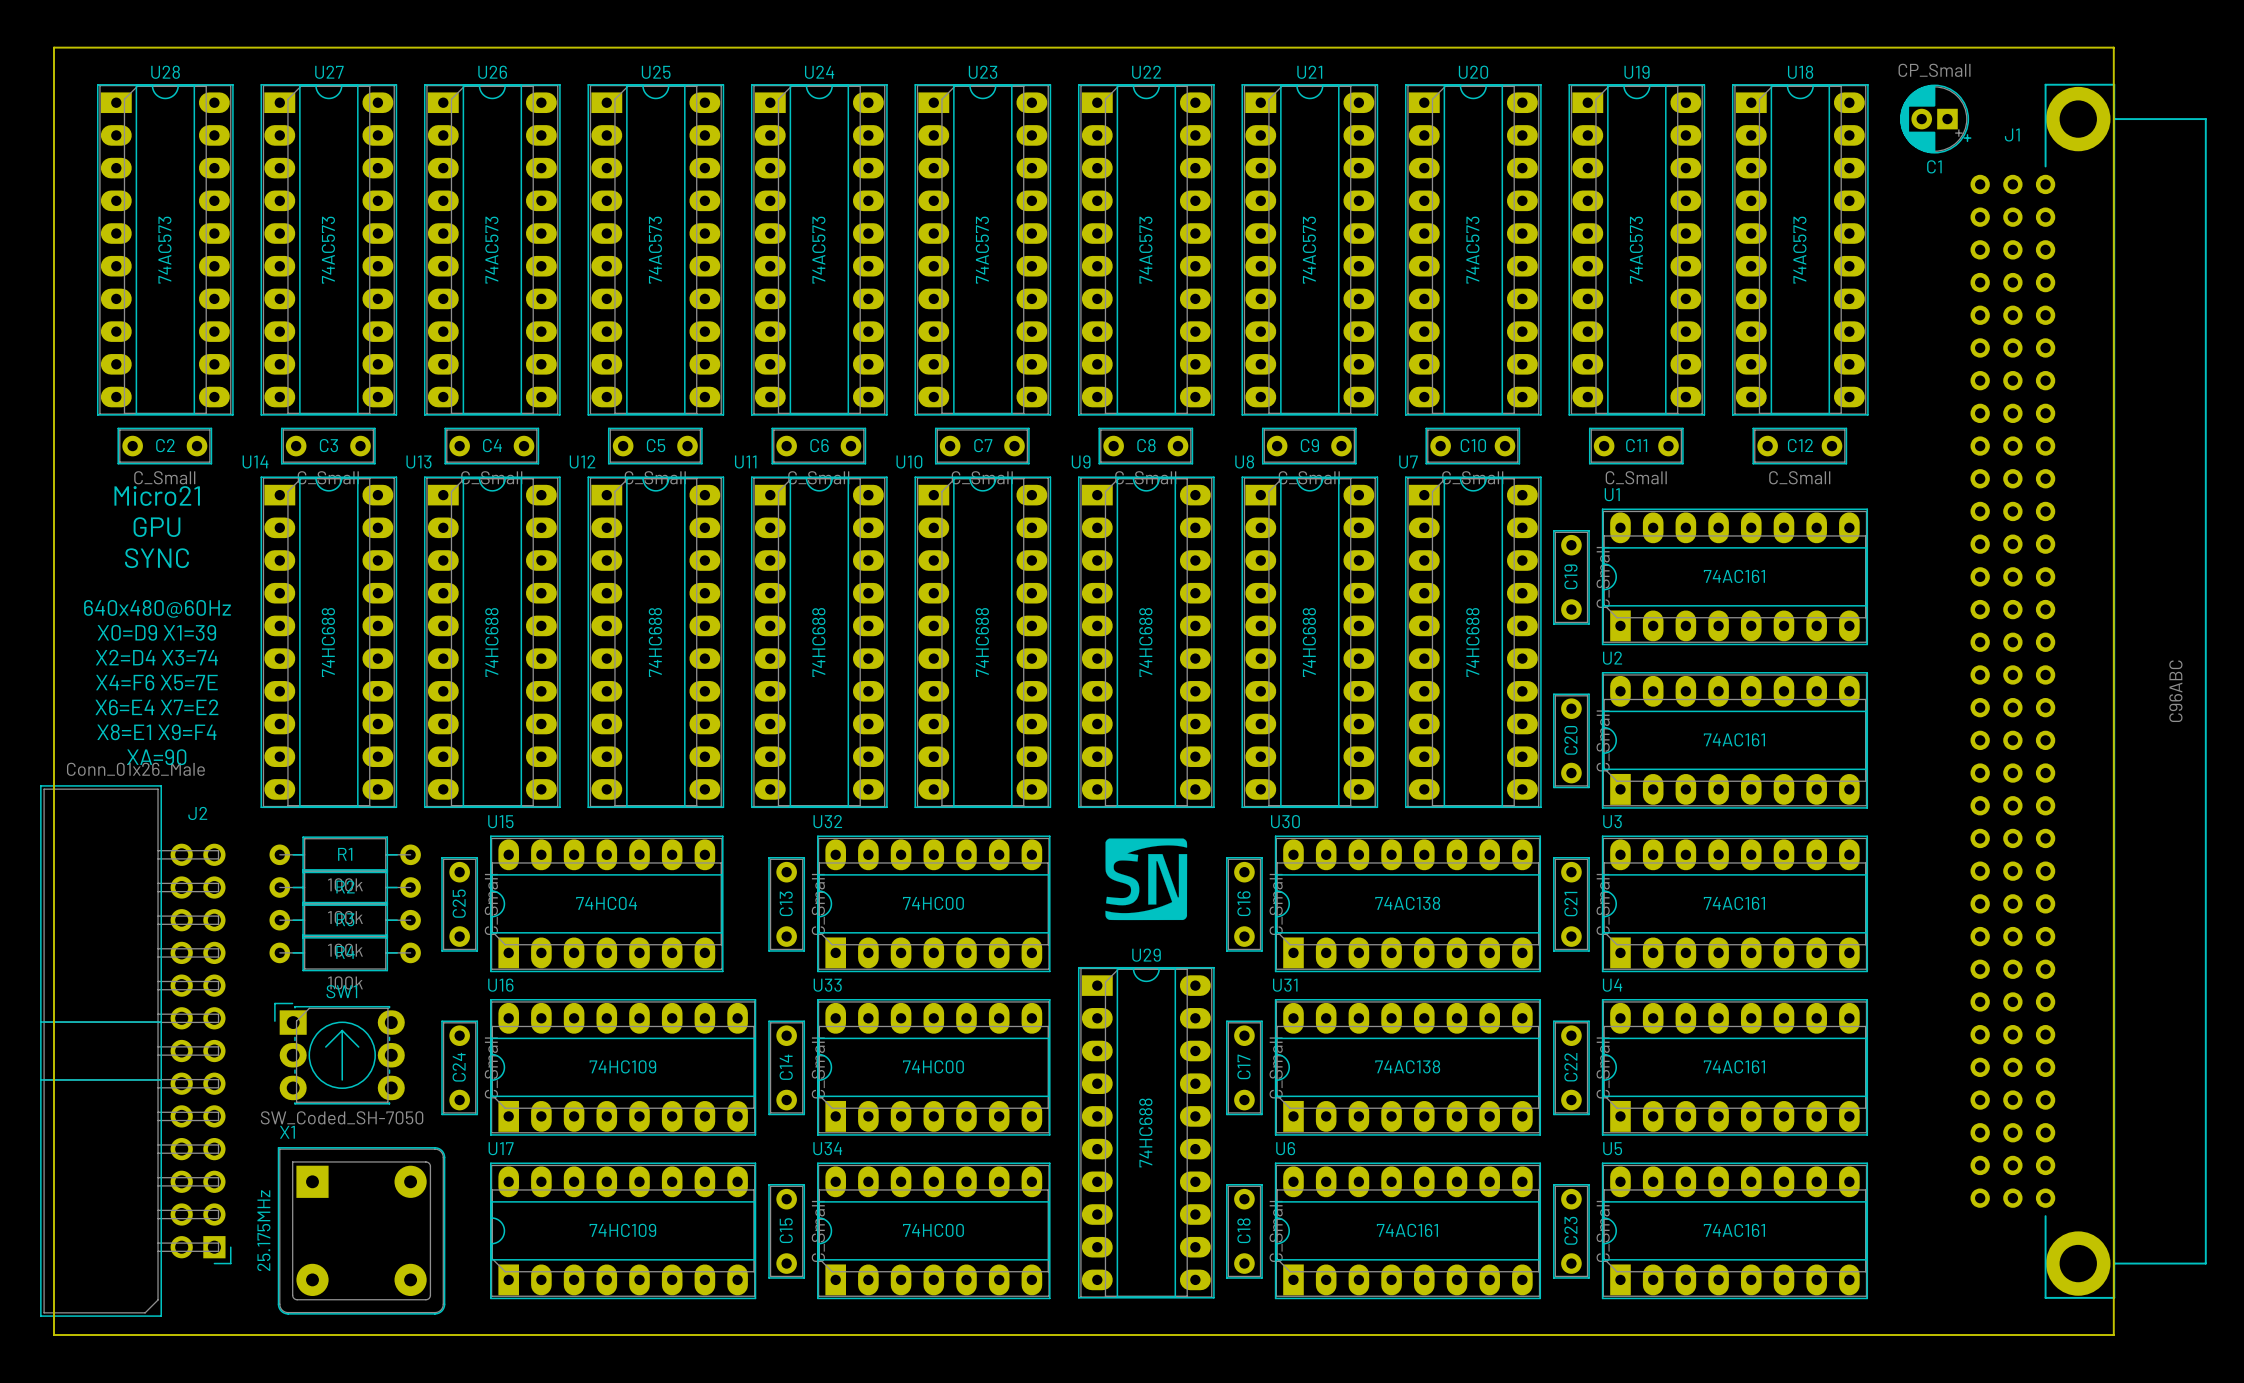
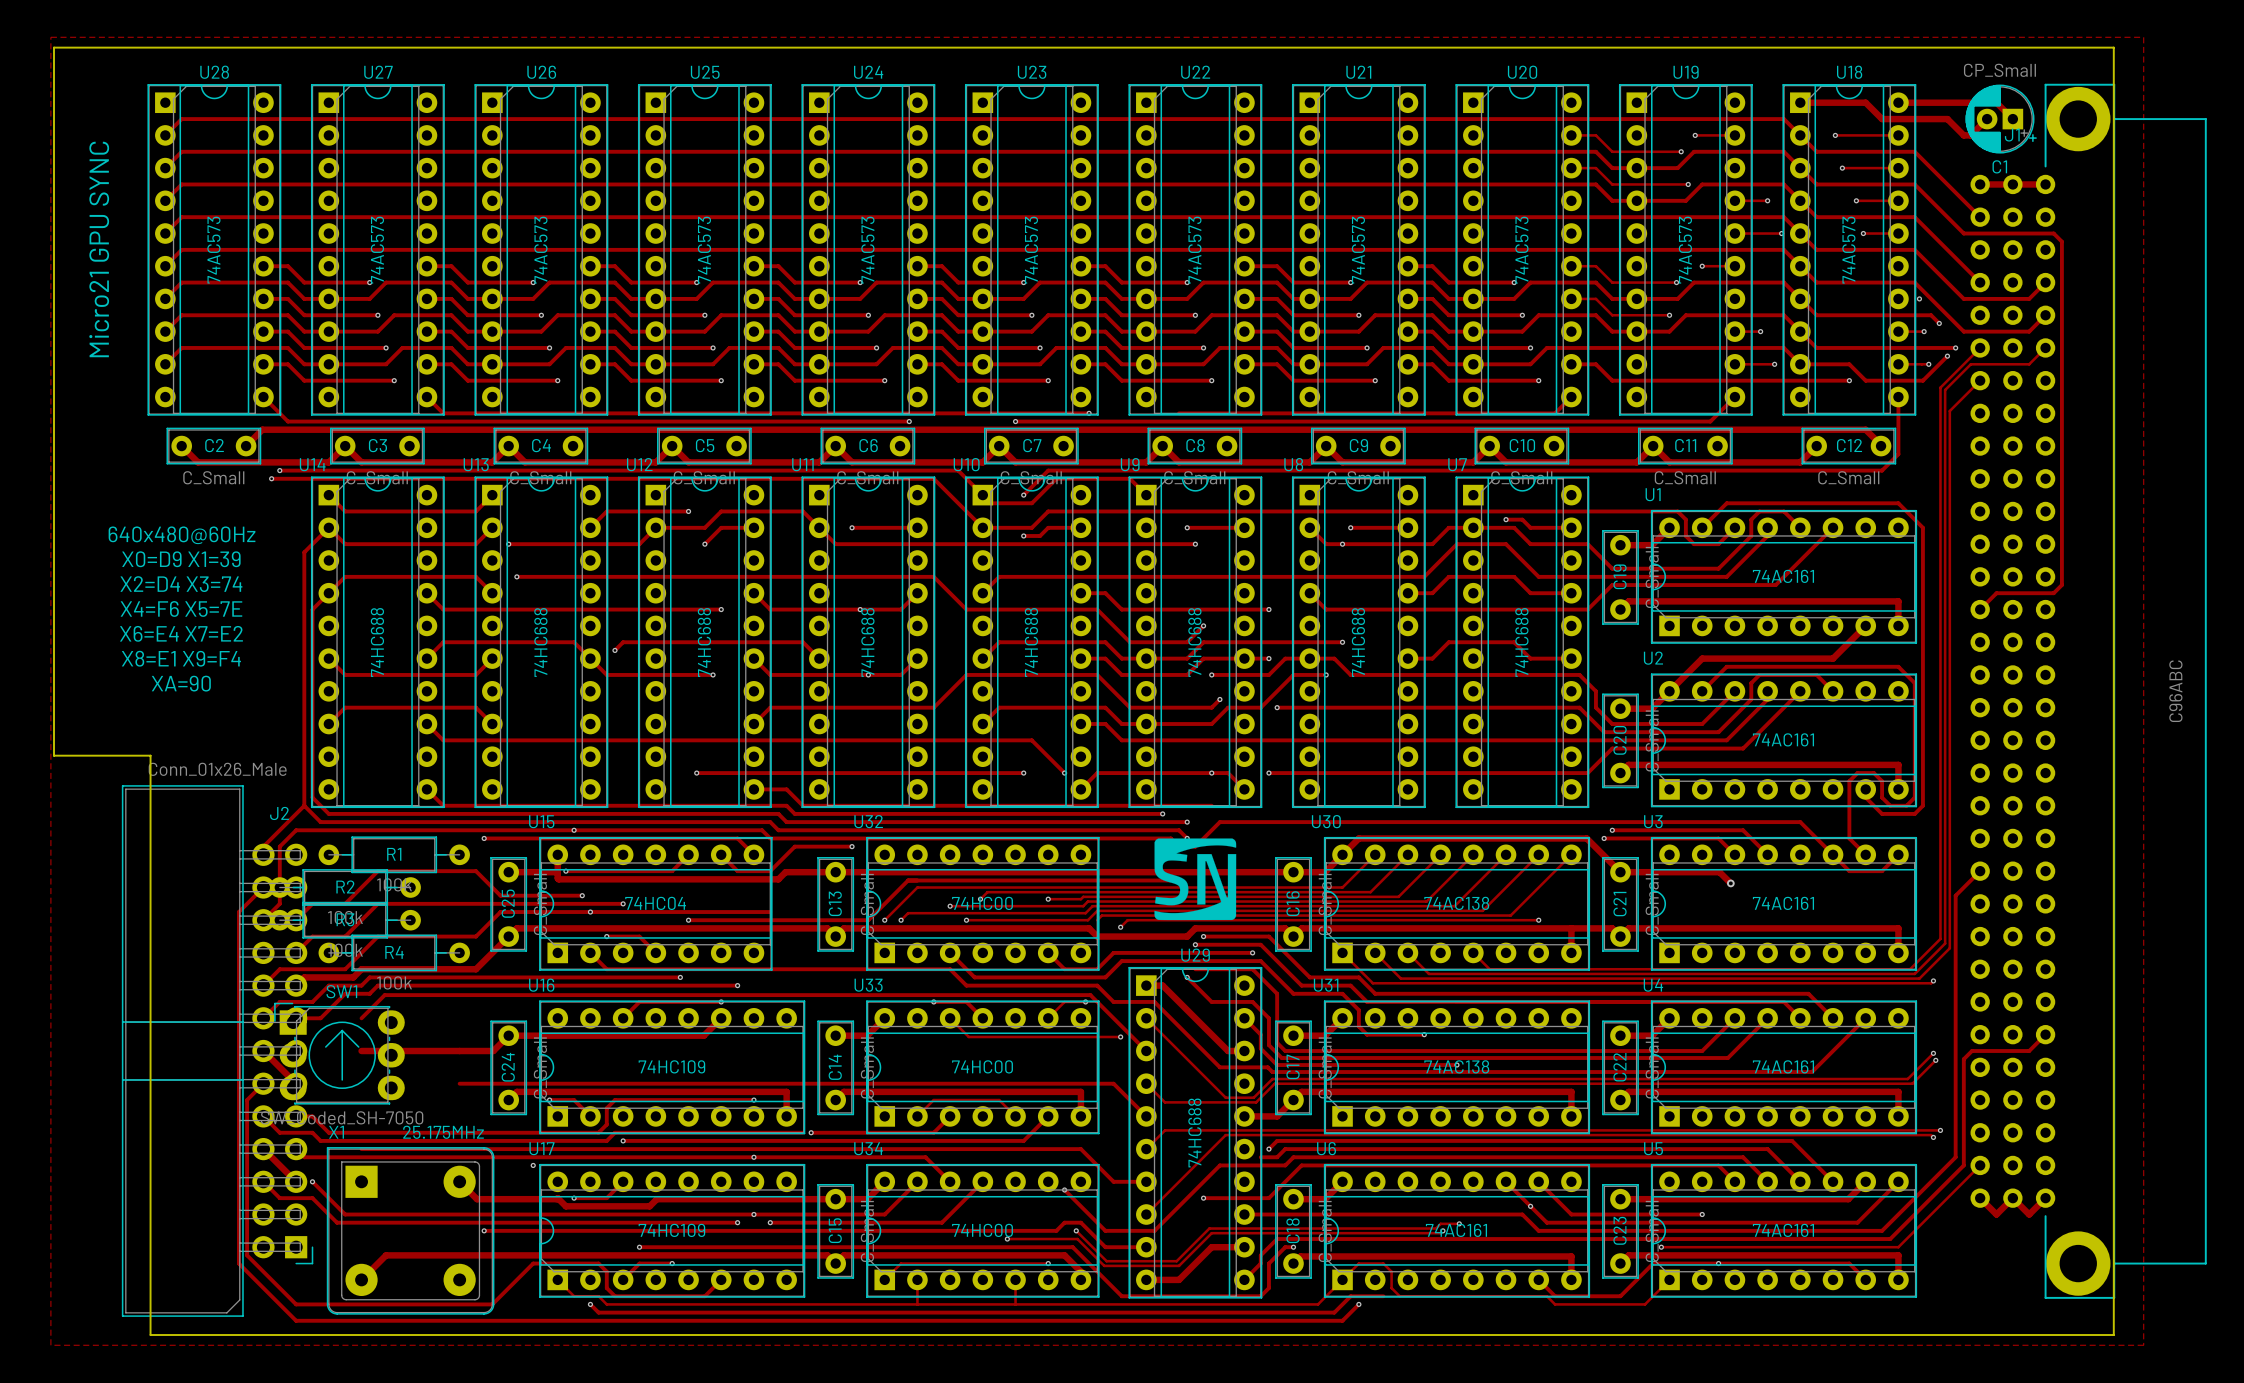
zone outline: none -> (50, 37) (2143, 37) (2143, 1345) (50, 1345) (50, 37)
U28 footprint: [96, 84, 234, 416] -> [147, 84, 282, 416]
U27 footprint: [260, 84, 398, 416] -> [310, 84, 445, 416]
U26 footprint: [423, 84, 561, 416] -> [474, 84, 609, 416]
U25 footprint: [587, 84, 725, 416] -> [637, 84, 772, 416]
U24 footprint: [750, 84, 888, 416] -> [801, 84, 936, 416]
U23 footprint: [914, 84, 1052, 416] -> [964, 84, 1099, 416]
U22 footprint: [1077, 84, 1215, 416] -> [1128, 84, 1263, 416]
U21 footprint: [1241, 84, 1379, 416] -> [1291, 84, 1426, 416]
U20 footprint: [1404, 84, 1542, 416] -> [1455, 84, 1590, 416]
U19 footprint: [1568, 84, 1706, 416] -> [1618, 84, 1753, 416]
U18 footprint: [1731, 84, 1869, 416] -> [1782, 84, 1917, 416]
track: none -> (1800, 102) (1865, 102) (1882, 119) (1947, 119) (1963, 135) (1970, 135) (1987, 119)
track: none -> (1898, 102) (1996, 102) (2012, 119)
C1 position: (1935, 119) -> (2001, 119)
track: none -> (165, 135) (181, 119) (1783, 119) (1816, 151) (1914, 151) (1980, 217)
track: none -> (1571, 135) (1595, 135) (1612, 151) (1681, 151)
track: none -> (1695, 135) (1734, 135)
via: none -> (1695, 135)
track: none -> (1835, 135) (1898, 135)
via: none -> (1835, 135)
via: none -> (1681, 151)
track: none -> (165, 168) (181, 151) (1595, 151) (1612, 168) (1677, 168) (1694, 151) (1783, 151) (1816, 184) (1914, 184) (1963, 233) (2053, 233) (2061, 241) (2061, 585) (2053, 593) (1996, 593) (1980, 609)
track: none -> (1571, 168) (1595, 168) (1612, 184) (1688, 184)
track: none -> (1842, 168) (1898, 168)
via: none -> (1842, 168)
via: none -> (1688, 184)
track: none -> (1980, 184) (2045, 184)
track: none -> (165, 200) (181, 184) (1595, 184) (1612, 200) (1685, 200) (1702, 184) (1783, 184) (1816, 217) (1914, 217) (1980, 282)
track: none -> (1734, 200) (1767, 200)
via: none -> (1767, 200)
track: none -> (1856, 200) (1898, 200)
via: none -> (1856, 200)
track: none -> (165, 233) (181, 217) (1783, 217) (1816, 249) (1914, 249) (1963, 298) (2029, 298) (2045, 282)
track: none -> (1734, 233) (1781, 233)
via: none -> (1781, 233)
track: none -> (1863, 233) (1898, 233)
via: none -> (1863, 233)
text: none -> Micro21 GPU SYNC (99, 249)
track: none -> (165, 266) (181, 249) (1783, 249) (1816, 282) (1914, 282) (1963, 331) (2029, 331) (2045, 315)
track: none -> (263, 266) (287, 266) (304, 282) (369, 282)
track: none -> (426, 266) (451, 266) (467, 282) (533, 282)
track: none -> (590, 266) (614, 266) (631, 282) (696, 282)
track: none -> (753, 266) (778, 266) (794, 282) (860, 282)
track: none -> (917, 266) (941, 266) (958, 282) (1023, 282)
track: none -> (1080, 266) (1105, 266) (1121, 282) (1187, 282)
track: none -> (1244, 266) (1277, 266) (1293, 282) (1350, 282)
track: none -> (1407, 266) (1432, 266) (1448, 282) (1514, 282)
track: none -> (1571, 266) (1595, 266) (1612, 282) (1676, 282)
track: none -> (1702, 266) (1734, 266)
via: none -> (1702, 266)
via: none -> (369, 282)
via: none -> (533, 282)
via: none -> (696, 282)
via: none -> (860, 282)
via: none -> (1023, 282)
via: none -> (1187, 282)
via: none -> (1350, 282)
via: none -> (1514, 282)
via: none -> (1676, 282)
track: none -> (165, 298) (181, 282) (287, 282) (304, 298) (369, 298) (386, 282) (451, 282) (467, 298) (533, 298) (549, 282) (614, 282) (631, 298) (696, 298) (713, 282) (778, 282) (794, 298) (860, 298) (876, 282) (941, 282) (958, 298) (1023, 298) (1040, 282) (1105, 282) (1121, 298) (1187, 298) (1203, 282) (1277, 282) (1293, 298) (1350, 298) (1367, 282) (1432, 282) (1448, 298) (1514, 298) (1530, 282) (1595, 282) (1612, 298) (1677, 298) (1694, 282) (1783, 282) (1816, 315) (1931, 315) (1939, 323)
track: none -> (263, 298) (287, 298) (304, 315) (377, 315)
track: none -> (426, 298) (451, 298) (467, 315) (541, 315)
track: none -> (590, 298) (614, 298) (631, 315) (704, 315)
track: none -> (753, 298) (778, 298) (794, 315) (868, 315)
track: none -> (917, 298) (941, 298) (958, 315) (1031, 315)
track: none -> (1080, 298) (1105, 298) (1121, 315) (1195, 315)
track: none -> (1244, 298) (1277, 298) (1293, 315) (1358, 315)
track: none -> (1407, 298) (1432, 298) (1448, 315) (1522, 315)
track: none -> (1571, 298) (1595, 298) (1612, 315) (1669, 315)
via: none -> (1919, 298)
via: none -> (377, 315)
via: none -> (541, 315)
via: none -> (704, 315)
via: none -> (868, 315)
via: none -> (1031, 315)
via: none -> (1195, 315)
via: none -> (1358, 315)
via: none -> (1522, 315)
via: none -> (1669, 315)
via: none -> (1939, 323)
track: none -> (165, 331) (181, 315) (287, 315) (304, 331) (377, 331) (394, 315) (451, 315) (467, 331) (541, 331) (557, 315) (614, 315) (631, 331) (704, 331) (721, 315) (778, 315) (794, 331) (868, 331) (884, 315) (941, 315) (958, 331) (1031, 331) (1048, 315) (1105, 315) (1121, 331) (1195, 331) (1211, 315) (1277, 315) (1293, 331) (1358, 331) (1375, 315) (1432, 315) (1448, 331) (1522, 331) (1538, 315) (1595, 315) (1612, 331) (1669, 331) (1685, 315) (1783, 315) (1816, 347) (1955, 347)
track: none -> (263, 331) (287, 331) (304, 347) (386, 347)
track: none -> (426, 331) (451, 331) (467, 347) (549, 347)
track: none -> (590, 331) (614, 331) (631, 347) (713, 347)
track: none -> (753, 331) (778, 331) (794, 347) (876, 347)
track: none -> (917, 331) (941, 331) (958, 347) (1040, 347)
track: none -> (1080, 331) (1105, 331) (1121, 347) (1203, 347)
track: none -> (1244, 331) (1277, 331) (1293, 347) (1367, 347)
track: none -> (1407, 331) (1432, 331) (1448, 347) (1530, 347)
track: none -> (1734, 331) (1760, 331)
via: none -> (1760, 331)
track: none -> (1898, 331) (1924, 331)
via: none -> (1924, 331)
via: none -> (386, 347)
via: none -> (549, 347)
via: none -> (713, 347)
via: none -> (876, 347)
via: none -> (1040, 347)
via: none -> (1203, 347)
via: none -> (1367, 347)
via: none -> (1530, 347)
via: none -> (1955, 347)
track: none -> (1980, 347) (1940, 387) (1940, 938) (1910, 969) (1489, 969) (1473, 952)
track: none -> (2045, 347) (2029, 364) (1970, 364) (1945, 390) (1945, 943) (1914, 973) (1428, 973) (1407, 952)
track: none -> (1947, 356) (1922, 380) (1865, 380) (1849, 364) (1800, 364) (1783, 347) (1546, 347) (1530, 364) (1448, 364) (1432, 347) (1383, 347) (1367, 364) (1293, 364) (1277, 347) (1219, 347) (1203, 364) (1121, 364) (1105, 347) (1056, 347) (1040, 364) (958, 364) (941, 347) (892, 347) (876, 364) (794, 364) (778, 347) (729, 347) (713, 364) (631, 364) (614, 347) (565, 347) (549, 364) (467, 364) (451, 347) (402, 347) (386, 364) (304, 364) (287, 347) (181, 347) (165, 364)
via: none -> (1947, 356)
track: none -> (263, 364) (287, 364) (304, 380) (394, 380)
track: none -> (426, 364) (451, 364) (467, 380) (557, 380)
track: none -> (590, 364) (614, 364) (631, 380) (721, 380)
track: none -> (753, 364) (778, 364) (794, 380) (884, 380)
track: none -> (917, 364) (941, 364) (958, 380) (1048, 380)
track: none -> (1080, 364) (1105, 364) (1121, 380) (1211, 380)
track: none -> (1244, 364) (1277, 364) (1293, 380) (1375, 380)
track: none -> (1407, 364) (1432, 364) (1448, 380) (1538, 380)
track: none -> (1571, 364) (1595, 364) (1612, 380) (1849, 380)
track: none -> (1734, 364) (1774, 364)
via: none -> (1774, 364)
track: none -> (1898, 364) (1928, 364)
via: none -> (1928, 364)
via: none -> (394, 380)
via: none -> (557, 380)
via: none -> (721, 380)
via: none -> (884, 380)
via: none -> (1048, 380)
via: none -> (1211, 380)
via: none -> (1375, 380)
via: none -> (1538, 380)
via: none -> (1849, 380)
track: none -> (1980, 380) (1949, 411) (1949, 948) (1919, 978) (1400, 978) (1375, 952)
track: none -> (263, 397) (287, 421) (909, 421)
track: none -> (426, 397) (443, 413) (1089, 413)
track: none -> (1571, 397) (1555, 413) (1179, 413)
track: none -> (1734, 397) (1710, 421) (1015, 421)
track: none -> (1898, 397) (1898, 454) (1882, 470) (1048, 470) (1023, 495)
via: none -> (1089, 413)
via: none -> (909, 421)
via: none -> (1015, 421)
C2 position: (164, 446) -> (213, 446)
track: none -> (181, 446) (198, 462) (328, 462) (345, 446) (361, 462) (492, 462) (508, 446) (525, 462) (655, 462) (672, 446) (688, 462) (819, 462) (835, 446) (852, 462) (982, 462) (999, 446) (1015, 462) (1146, 462) (1162, 446) (1179, 462) (1309, 462) (1326, 446) (1342, 462) (1473, 462) (1489, 446) (1506, 462) (1636, 462) (1653, 446) (1669, 462) (1800, 462) (1816, 446)
track: none -> (246, 446) (262, 429) (1865, 429) (1881, 447)
C3 position: (328, 446) -> (377, 446)
C4 position: (491, 446) -> (540, 446)
C5 position: (655, 446) -> (704, 446)
C6 position: (818, 446) -> (867, 446)
C7 position: (982, 446) -> (1031, 446)
C8 position: (1145, 446) -> (1194, 446)
C9 position: (1309, 446) -> (1358, 446)
C10 position: (1472, 446) -> (1521, 446)
C11 position: (1636, 446) -> (1685, 446)
C12 position: (1799, 446) -> (1848, 446)
track: none -> (279, 470) (958, 470) (991, 503) (1031, 503) (1056, 478) (1129, 478) (1146, 495)
via: none -> (279, 470)
U14 footprint: [260, 476, 398, 809] -> [310, 476, 445, 809]
U13 footprint: [423, 476, 561, 809] -> [474, 476, 609, 809]
U12 footprint: [587, 476, 725, 809] -> [637, 476, 772, 809]
U11 footprint: [750, 476, 888, 809] -> [801, 476, 936, 809]
U10 footprint: [914, 476, 1052, 809] -> [964, 476, 1099, 809]
U9 footprint: [1077, 476, 1215, 809] -> [1128, 476, 1263, 809]
U8 footprint: [1241, 476, 1379, 809] -> [1291, 476, 1426, 809]
U7 footprint: [1404, 476, 1542, 809] -> [1455, 476, 1590, 809]
track: none -> (271, 478) (933, 478) (982, 527) (1031, 527) (1048, 511) (1677, 511) (1685, 519) (1685, 535) (1694, 544) (1718, 544) (1734, 527)
via: none -> (271, 478)
text: Micro21 (157, 495) -> none
track: none -> (328, 495) (345, 511) (476, 511) (492, 495)
via: none -> (1023, 495)
U1 footprint: [1601, 508, 1869, 646] -> [1650, 509, 1918, 644]
track: none -> (688, 511) (606, 511) (590, 527)
via: none -> (688, 511)
track: none -> (1506, 519) (1522, 519) (1530, 527) (1571, 527)
via: none -> (1506, 519)
text: GPU (156, 527) -> none
track: none -> (492, 527) (476, 544) (345, 544) (328, 527) (304, 552) (304, 805)
track: none -> (753, 527) (721, 527) (704, 544)
track: none -> (852, 527) (917, 527)
via: none -> (852, 527)
track: none -> (1080, 527) (1048, 527) (1040, 535) (1023, 535)
track: none -> (1187, 527) (1244, 527)
via: none -> (1187, 527)
track: none -> (1309, 527) (1326, 544) (1432, 544) (1448, 527) (1514, 527) (1530, 544) (1587, 544) (1612, 568) (1718, 568) (1751, 535) (1751, 519) (1759, 511) (1783, 511) (1800, 527)
track: none -> (1350, 527) (1407, 527)
via: none -> (1350, 527)
track: none -> (1669, 527) (1652, 545) (1620, 545)
track: none -> (1702, 527) (1726, 503) (1898, 503) (1922, 527) (1922, 805) (1914, 813) (1882, 813) (1865, 797) (1865, 789)
track: none -> (1767, 527) (1767, 535) (1726, 576) (1538, 576) (1506, 544) (1456, 544) (1424, 576) (999, 576) (982, 593)
track: none -> (1833, 527) (1775, 585) (1612, 585) (1587, 609) (1326, 609) (1309, 593)
via: none -> (1023, 535)
track: none -> (508, 544) (639, 544) (655, 527) (704, 527) (721, 511) (802, 511) (835, 544) (1195, 544)
via: none -> (508, 544)
via: none -> (704, 544)
via: none -> (1195, 544)
via: none -> (1342, 544)
text: SYNC (157, 558) -> none
track: none -> (516, 576) (933, 576) (966, 609) (1097, 609) (1129, 642) (1187, 642) (1203, 625)
via: none -> (516, 576)
C19 position: (1571, 577) -> (1620, 577)
track: none -> (426, 593) (443, 609) (721, 609)
track: none -> (492, 593) (476, 576) (345, 576) (312, 609) (312, 797) (328, 813) (778, 813) (786, 822) (1187, 822)
track: none -> (753, 593) (770, 609) (901, 609) (917, 593)
track: none -> (1080, 593) (1105, 593) (1121, 609) (1268, 609)
track: none -> (1407, 593) (1432, 593) (1448, 576) (1514, 576) (1530, 593) (1571, 593)
text position: 640x480@60Hz (157, 608) -> 640x480@60Hz (182, 535)
via: none -> (721, 609)
via: none -> (860, 609)
via: none -> (1268, 609)
track: none -> (1620, 609) (1628, 601) (1898, 601) (1898, 625)
via: none -> (1203, 625)
track: none -> (1865, 625) (1833, 658) (1702, 658) (1652, 708) (1620, 708)
text position: X0=D9 X1=39 (156, 632) -> X0=D9 X1=39 (181, 559)
track: none -> (1342, 642) (1203, 642) (1187, 658) (1121, 658) (1105, 642) (999, 642) (982, 658)
via: none -> (1342, 642)
track: none -> (614, 650) (623, 642) (802, 642) (819, 658)
via: none -> (614, 650)
text position: X2=D4 X3=74 (156, 657) -> X2=D4 X3=74 (181, 584)
track: none -> (328, 658) (345, 674) (476, 674) (492, 658)
track: none -> (426, 658) (443, 642) (574, 642) (606, 674) (713, 674)
track: none -> (753, 658) (770, 674) (901, 674) (917, 658)
track: none -> (1080, 658) (1105, 658) (1121, 674) (1187, 674) (1203, 658) (1268, 658)
via: none -> (1268, 658)
track: none -> (1407, 658) (1432, 658) (1448, 642) (1514, 642) (1530, 658) (1571, 658)
U2 footprint: [1601, 672, 1869, 809] -> [1650, 673, 1918, 808]
via: none -> (713, 674)
via: none -> (868, 674)
track: none -> (1211, 674) (1268, 674) (1285, 658) (1334, 658) (1350, 674) (1579, 674) (1595, 691) (1595, 707) (1612, 724) (1702, 724) (1734, 691)
via: none -> (1211, 674)
track: none -> (1326, 674) (1293, 674) (1260, 707) (1228, 707) (1211, 724) (1121, 724) (1105, 707) (999, 707) (982, 724)
via: none -> (1326, 674)
text position: X4=F6 X5=7E (156, 682) -> X4=F6 X5=7E (181, 608)
track: none -> (1702, 691) (1726, 666) (1898, 666) (1914, 683) (1914, 797) (1906, 805) (1890, 805) (1882, 797) (1882, 781) (1873, 773) (1857, 773) (1849, 781) (1849, 838) (1865, 854)
track: none -> (1767, 691) (1767, 699) (1726, 740) (1121, 740) (1105, 724) (1080, 724)
track: none -> (1800, 691) (1743, 748) (1612, 748) (1587, 773) (1268, 773)
track: none -> (1833, 691) (1816, 674) (1759, 674) (1751, 683) (1751, 699) (1718, 732) (1604, 732) (1579, 707) (1277, 707)
track: none -> (1219, 699) (1211, 707) (1129, 707) (1097, 674) (966, 674) (933, 707) (770, 707) (753, 724)
via: none -> (1219, 699)
text position: X6=E4 X7=E2 (156, 707) -> X6=E4 X7=E2 (181, 633)
via: none -> (1277, 707)
track: none -> (328, 724) (345, 707) (476, 707) (492, 724)
track: none -> (426, 724) (443, 740) (1031, 740) (1064, 773)
text position: X8=E1 X9=F4 (156, 732) -> X8=E1 X9=F4 (181, 658)
C20 position: (1571, 740) -> (1620, 740)
board edge: (53, 755) (53, 1335) (150, 1335) -> (53, 755) (150, 755) (150, 1335)
text position: XA=90 (156, 757) -> XA=90 (181, 683)
track: none -> (696, 773) (1023, 773)
via: none -> (696, 773)
via: none -> (1023, 773)
via: none -> (1064, 773)
via: none -> (1211, 773)
via: none -> (1268, 773)
track: none -> (1620, 773) (1628, 764) (1898, 764) (1898, 789)
track: none -> (426, 789) (443, 805) (786, 805) (794, 813) (1162, 813)
track: none -> (753, 789) (786, 789) (802, 805) (1211, 805)
track: none -> (1080, 789) (1097, 773) (1228, 773) (1244, 789)
track: none -> (304, 805) (263, 846) (263, 854)
track: none -> (304, 805) (320, 822) (770, 822) (778, 830) (1179, 830) (1187, 838)
via: none -> (1162, 813)
via: none -> (1187, 822)
via: none -> (574, 830)
track: none -> (1612, 830) (1743, 830) (1767, 854)
via: none -> (1612, 830)
U15 footprint: [490, 835, 724, 973] -> [539, 836, 773, 971]
U32 footprint: [817, 835, 1051, 973] -> [866, 836, 1100, 971]
U30 footprint: [1274, 835, 1542, 973] -> [1323, 836, 1591, 971]
U3 footprint: [1601, 835, 1869, 973] -> [1650, 836, 1918, 971]
track: none -> (484, 838) (737, 838) (753, 854) (745, 854)
via: none -> (484, 838)
via: none -> (1187, 838)
track: none -> (1604, 838) (1718, 838) (1734, 854)
via: none -> (1604, 838)
track: none -> (852, 846) (794, 846) (770, 871) (737, 871) (721, 854)
via: none -> (852, 846)
R1 position: (345, 854) -> (394, 854)
track: none -> (557, 854) (558, 879) (778, 879) (785, 872) (1325, 872) (1358, 838) (1586, 838) (1620, 872) (1719, 872) (1730, 883)
track: none -> (688, 854) (672, 871) (565, 871)
track: none -> (1375, 854) (1342, 887) (917, 887) (884, 920)
track: none -> (1407, 854) (1370, 892) (987, 892) (980, 899)
track: none -> (1440, 854) (1398, 896) (1083, 896) (1080, 899) (1048, 899)
track: none -> (1473, 854) (1426, 901) (1087, 901) (1083, 906) (950, 906)
track: none -> (1506, 854) (1454, 906) (1092, 906) (1085, 913) (908, 913) (901, 920)
track: none -> (1538, 854) (1482, 910) (1097, 910) (1087, 920) (966, 920)
track: none -> (1571, 854) (1510, 915) (1101, 915) (1097, 920)
track: none -> (1898, 854) (1882, 871) (1849, 871) (1800, 822) (1219, 822) (1195, 846) (1179, 846) (1170, 838) (770, 838) (762, 830) (296, 830) (279, 846) (279, 903) (263, 920)
track: none -> (557, 871) (508, 872)
via: none -> (565, 871)
track: none -> (1980, 871) (1955, 895) (1955, 1157) (1882, 1230) (1538, 1230) (1522, 1214) (1244, 1214)
drawing position: (1146, 879) -> (1195, 879)
track: none -> (1170, 880) (908, 880) (868, 920) (688, 920)
via: none -> (1730, 883)
track: none -> (263, 887) (238, 912) (238, 1263) (296, 1320) (1342, 1320) (1358, 1304)
track: none -> (582, 895) (500, 895) (476, 871) (377, 871) (345, 903) (312, 903) (296, 920)
via: none -> (582, 895)
via: none -> (980, 899)
via: none -> (1048, 899)
track: none -> (623, 903) (377, 903) (345, 936) (312, 936) (296, 952)
via: none -> (623, 903)
C25 position: (459, 904) -> (508, 904)
C13 position: (786, 904) -> (835, 904)
C16 position: (1244, 904) -> (1293, 904)
C21 position: (1571, 904) -> (1620, 904)
via: none -> (950, 906)
via: none -> (590, 912)
track: none -> (770, 912) (500, 912) (476, 936) (377, 936) (345, 969) (279, 969) (263, 985)
via: none -> (688, 920)
via: none -> (884, 920)
via: none -> (901, 920)
via: none -> (966, 920)
track: none -> (1538, 920) (1127, 920) (1120, 927)
via: none -> (1538, 920)
via: none -> (1120, 927)
track: none -> (1571, 928) (1301, 928) (1293, 936) (1285, 928) (1195, 928) (1187, 936) (1097, 936) (1089, 928) (843, 928) (835, 936) (827, 928) (516, 928) (476, 969) (361, 969) (353, 977) (304, 977) (296, 985)
track: none -> (606, 936) (639, 936) (655, 952)
via: none -> (606, 936)
track: none -> (1203, 936) (1268, 936) (1309, 977) (1358, 977) (1375, 993) (1808, 993) (1833, 1018)
via: none -> (1203, 936)
track: none -> (1195, 944) (1260, 944) (1301, 985) (1350, 985) (1367, 1001) (1783, 1001) (1800, 1018)
via: none -> (1195, 944)
R4 position: (345, 952) -> (394, 952)
track: none -> (590, 952) (606, 969) (950, 969) (966, 985) (1097, 985) (1113, 1001) (1154, 1001) (1219, 1067) (1267, 1067) (1272, 1072) (1812, 1072) (1865, 1018)
track: none -> (950, 952) (974, 977) (1105, 977) (1121, 961) (1260, 961) (1293, 993) (1342, 993) (1358, 1010) (1358, 1026) (1367, 1034) (1424, 1034)
track: none -> (1048, 952) (1064, 969) (1097, 969) (1113, 952) (1252, 952)
via: none -> (1252, 952)
track: none -> (1342, 952) (1372, 983) (1931, 983) (1933, 980)
track: none -> (1571, 952) (1571, 928) (1612, 928) (1620, 936) (1628, 928) (1898, 928) (1898, 952)
U29 footprint: [1077, 966, 1215, 1299] -> [1128, 966, 1263, 1299]
track: none -> (1195, 969) (1252, 969) (1277, 993) (1277, 1042) (1285, 1051) (1702, 1051) (1734, 1018) (1734, 1026)
track: none -> (680, 977) (369, 977) (361, 985) (328, 985) (312, 1001) (279, 1001) (263, 1018)
via: none -> (680, 977)
track: none -> (1187, 977) (1211, 1001) (1252, 1001) (1268, 1018) (1268, 1045) (1281, 1058) (1727, 1058) (1767, 1018)
via: none -> (1187, 977)
via: none -> (1933, 980)
track: none -> (737, 985) (377, 985) (369, 993) (345, 993) (320, 1018) (296, 1018)
via: none -> (737, 985)
track: none -> (1146, 985) (1162, 985) (1228, 1051) (1244, 1051)
U16 footprint: [490, 999, 757, 1136] -> [539, 1000, 806, 1135]
U33 footprint: [817, 999, 1051, 1136] -> [866, 1000, 1100, 1135]
U31 footprint: [1274, 999, 1542, 1136] -> [1323, 1000, 1591, 1135]
U4 footprint: [1601, 999, 1869, 1136] -> [1650, 1000, 1918, 1135]
track: none -> (721, 1001) (639, 1001) (623, 1018)
via: none -> (721, 1001)
track: none -> (933, 1001) (966, 1001) (982, 1018)
via: none -> (933, 1001)
track: none -> (1085, 1001) (1064, 1001) (1048, 1018)
via: none -> (1085, 1001)
track: none -> (361, 1018) (384, 995) (1090, 995) (1146, 1051)
track: none -> (721, 1018) (703, 1035) (508, 1035) (493, 1051) (361, 1051)
track: none -> (884, 1018) (867, 1035) (835, 1035)
track: none -> (950, 1018) (968, 1036) (1120, 1036)
track: none -> (1146, 1018) (1225, 1097) (1253, 1097) (1272, 1079) (1907, 1079) (1933, 1053)
track: none -> (1244, 1018) (1260, 1034) (1260, 1048) (1277, 1065) (1456, 1065)
track: none -> (1342, 1018) (1325, 1035) (1293, 1035)
track: none -> (1669, 1018) (1652, 1035) (1620, 1035)
via: none -> (1424, 1034)
track: none -> (2045, 1034) (2029, 1051) (1972, 1051) (1963, 1059) (1963, 1165) (1890, 1239) (1277, 1239) (1260, 1255) (1260, 1263) (1244, 1279)
via: none -> (1120, 1036)
J2 position: (135, 1051) -> (217, 1051)
track: none -> (263, 1051) (296, 1083)
via: none -> (1933, 1053)
track: none -> (1935, 1060) (1912, 1083) (1274, 1083) (1256, 1102) (1165, 1102) (1146, 1083)
via: none -> (1935, 1060)
via: none -> (1456, 1065)
C24 position: (459, 1067) -> (508, 1067)
C14 position: (786, 1067) -> (835, 1067)
C17 position: (1244, 1067) -> (1293, 1067)
C22 position: (1571, 1067) -> (1620, 1067)
track: none -> (263, 1083) (247, 1100) (247, 1255) (296, 1304) (492, 1304) (533, 1263) (598, 1263) (606, 1271) (606, 1288) (614, 1296) (704, 1296) (721, 1279)
track: none -> (459, 1083) (1113, 1083) (1146, 1116)
track: none -> (508, 1100) (516, 1091) (786, 1091) (786, 1116)
track: none -> (549, 1100) (574, 1100) (590, 1116)
via: none -> (549, 1100)
track: none -> (753, 1100) (614, 1100) (606, 1108) (606, 1124) (598, 1132) (328, 1132) (312, 1116) (296, 1116)
via: none -> (753, 1100)
track: none -> (835, 1100) (843, 1091) (1080, 1091) (1080, 1116)
track: none -> (1620, 1100) (1628, 1091) (1898, 1091) (1898, 1116)
track: none -> (263, 1116) (279, 1132) (312, 1132) (320, 1140) (606, 1140) (614, 1132) (802, 1132)
track: none -> (917, 1116) (933, 1100) (999, 1100) (1015, 1116)
track: none -> (950, 1116) (933, 1132) (811, 1132)
track: none -> (1048, 1116) (1023, 1140) (623, 1140)
track: none -> (1244, 1116) (1277, 1116) (1301, 1091) (1571, 1091) (1571, 1116)
track: none -> (1940, 1130) (1165, 1130) (1146, 1149)
via: none -> (1940, 1130)
via: none -> (811, 1132)
track: none -> (1933, 1137) (1931, 1135) (1225, 1135) (1146, 1214)
via: none -> (1933, 1137)
via: none -> (623, 1140)
track: none -> (263, 1149) (296, 1181)
track: none -> (296, 1149) (304, 1157) (925, 1157) (950, 1181)
track: none -> (361, 1149) (1080, 1149) (1113, 1181) (1146, 1181)
track: none -> (1268, 1149) (1277, 1140) (1792, 1140) (1833, 1181)
via: none -> (1268, 1149)
via: none -> (753, 1157)
track: none -> (1260, 1157) (1277, 1157) (1285, 1149) (1767, 1149) (1800, 1181)
U17 footprint: [490, 1162, 757, 1300] -> [539, 1163, 806, 1298]
U34 footprint: [817, 1162, 1051, 1300] -> [866, 1163, 1100, 1298]
U6 footprint: [1274, 1162, 1542, 1300] -> [1323, 1163, 1591, 1298]
U5 footprint: [1601, 1162, 1869, 1300] -> [1650, 1163, 1918, 1298]
via: none -> (533, 1165)
track: none -> (1980, 1165) (1898, 1247) (1661, 1247)
track: none -> (263, 1181) (279, 1198) (312, 1198) (337, 1222) (737, 1222)
track: none -> (312, 1181) (345, 1214) (884, 1214) (917, 1181)
via: none -> (312, 1181)
track: none -> (459, 1181) (477, 1199) (557, 1198) (565, 1206) (649, 1206) (656, 1199) (867, 1199) (884, 1181)
track: none -> (623, 1181) (606, 1198) (574, 1198)
track: none -> (982, 1181) (941, 1222) (770, 1222)
track: none -> (1342, 1181) (1325, 1199) (1293, 1199)
track: none -> (1506, 1181) (1546, 1222) (1857, 1222) (1898, 1181)
track: none -> (1538, 1181) (1571, 1214) (1702, 1214)
track: none -> (1734, 1181) (1718, 1165) (1301, 1165) (1268, 1198) (1203, 1198)
track: none -> (1767, 1181) (1743, 1157) (1293, 1157) (1285, 1165) (1219, 1165) (1154, 1230) (1105, 1230) (1064, 1189)
track: none -> (1865, 1181) (1848, 1199) (1620, 1199)
via: none -> (1064, 1189)
via: none -> (574, 1198)
via: none -> (1203, 1198)
track: none -> (1980, 1198) (1996, 1214) (2012, 1198) (2029, 1214) (2045, 1198)
via: none -> (1530, 1206)
via: none -> (753, 1214)
via: none -> (1702, 1214)
via: none -> (737, 1222)
via: none -> (770, 1222)
track: none -> (1459, 1223) (1440, 1223) (1435, 1228) (1209, 1228) (1176, 1261) (1106, 1261) (1076, 1230)
via: none -> (1459, 1223)
X1 value rotation: 0° (263, 1230) -> 90° clockwise (443, 1132)
X1 value position: 25.175MHz (263, 1230) -> 25.175MHz (443, 1132)
X1 position: (361, 1230) -> (410, 1230)
track: none -> (484, 1230) (1056, 1230) (1064, 1222) (1080, 1222) (1105, 1247) (1146, 1247)
via: none -> (484, 1230)
via: none -> (1076, 1230)
track: none -> (1442, 1230) (1440, 1233) (1211, 1233) (1179, 1265) (1104, 1265) (1077, 1239) (1007, 1239)
via: none -> (1442, 1230)
C15 position: (786, 1231) -> (835, 1231)
C18 position: (1244, 1231) -> (1293, 1231)
C23 position: (1571, 1231) -> (1620, 1231)
via: none -> (1007, 1239)
track: none -> (639, 1247) (1072, 1247) (1121, 1296) (1260, 1296) (1268, 1288) (1268, 1263) (1285, 1247) (1293, 1247)
via: none -> (639, 1247)
track: none -> (1244, 1247) (1211, 1247) (1179, 1279) (1146, 1279)
via: none -> (1293, 1247)
via: none -> (1661, 1247)
track: none -> (672, 1263) (639, 1263) (623, 1279)
via: none -> (672, 1263)
track: none -> (1048, 1263) (901, 1263) (884, 1279)
via: none -> (1048, 1263)
track: none -> (1293, 1263) (1300, 1256) (1571, 1256) (1571, 1279)
track: none -> (1620, 1263) (1628, 1255) (1898, 1255) (1898, 1279)
via: none -> (1718, 1263)
track: none -> (361, 1279) (386, 1255) (827, 1255) (835, 1263) (843, 1255) (1064, 1255) (1080, 1271) (1080, 1279)
track: none -> (557, 1279) (574, 1296) (598, 1296) (606, 1304) (1318, 1304) (1358, 1263) (1383, 1263) (1391, 1271) (1391, 1288) (1399, 1296) (1546, 1296) (1555, 1304) (1645, 1304) (1669, 1279)
track: none -> (917, 1279) (917, 1304)
track: none -> (1015, 1279) (1015, 1304)
track: none -> (1538, 1279) (1555, 1296) (1620, 1296) (1653, 1263) (1849, 1263) (1865, 1279)
track: none -> (1383, 1296) (1350, 1296) (1334, 1312) (598, 1312) (590, 1304)
via: none -> (590, 1304)
via: none -> (1358, 1304)

